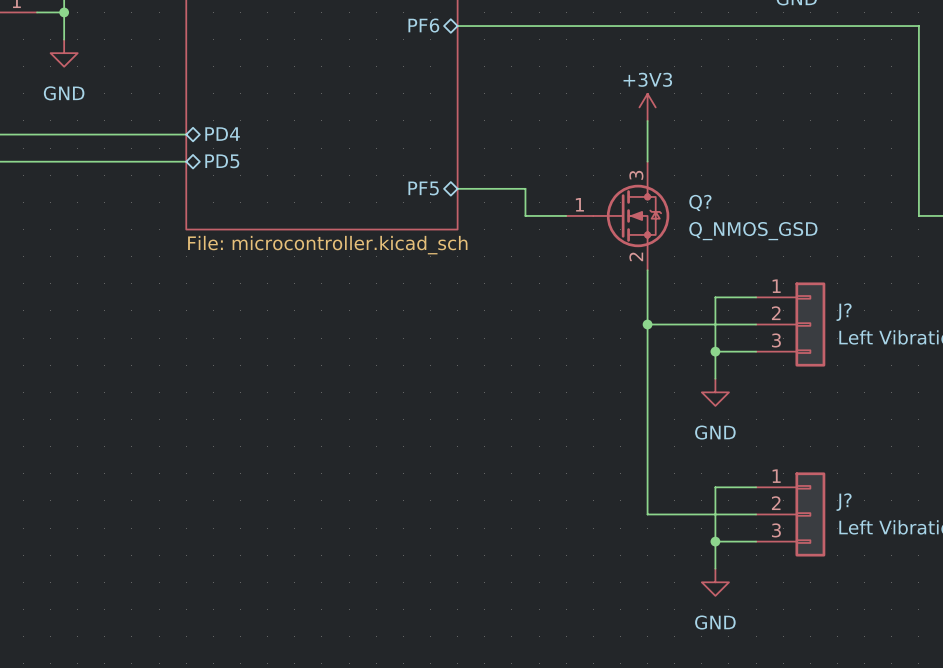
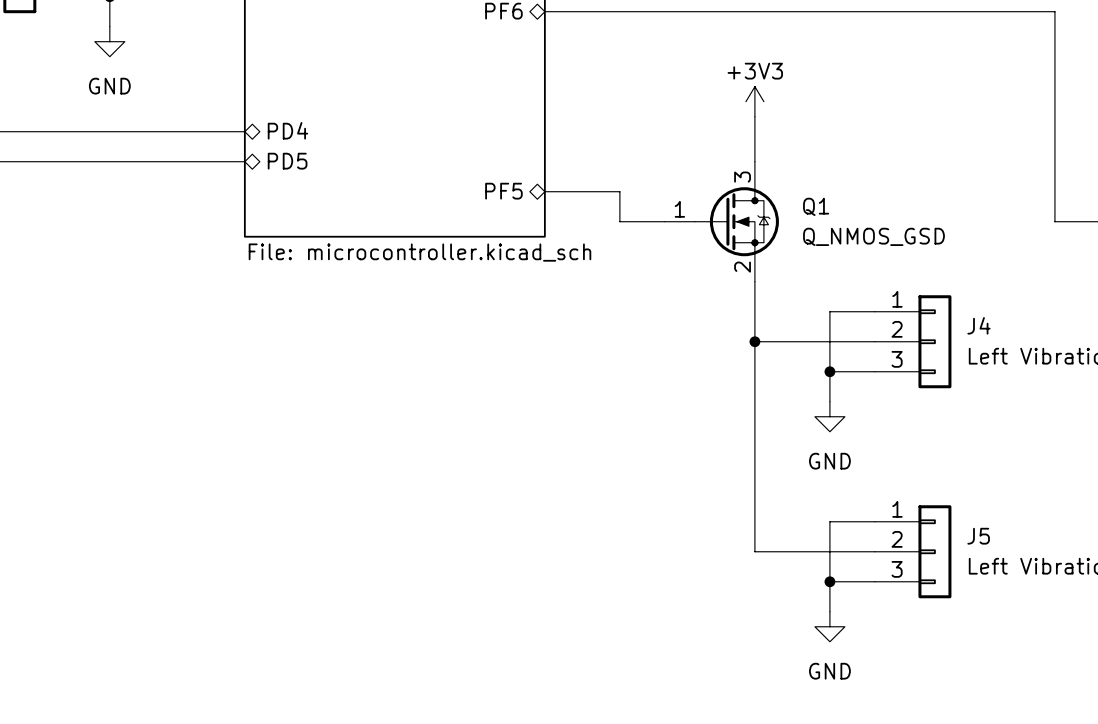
Q? name: Q? (700, 202) -> Q1 (816, 206)
J? name: J? (844, 312) -> J4 (978, 325)
J? name: J? (844, 502) -> J5 (978, 536)

